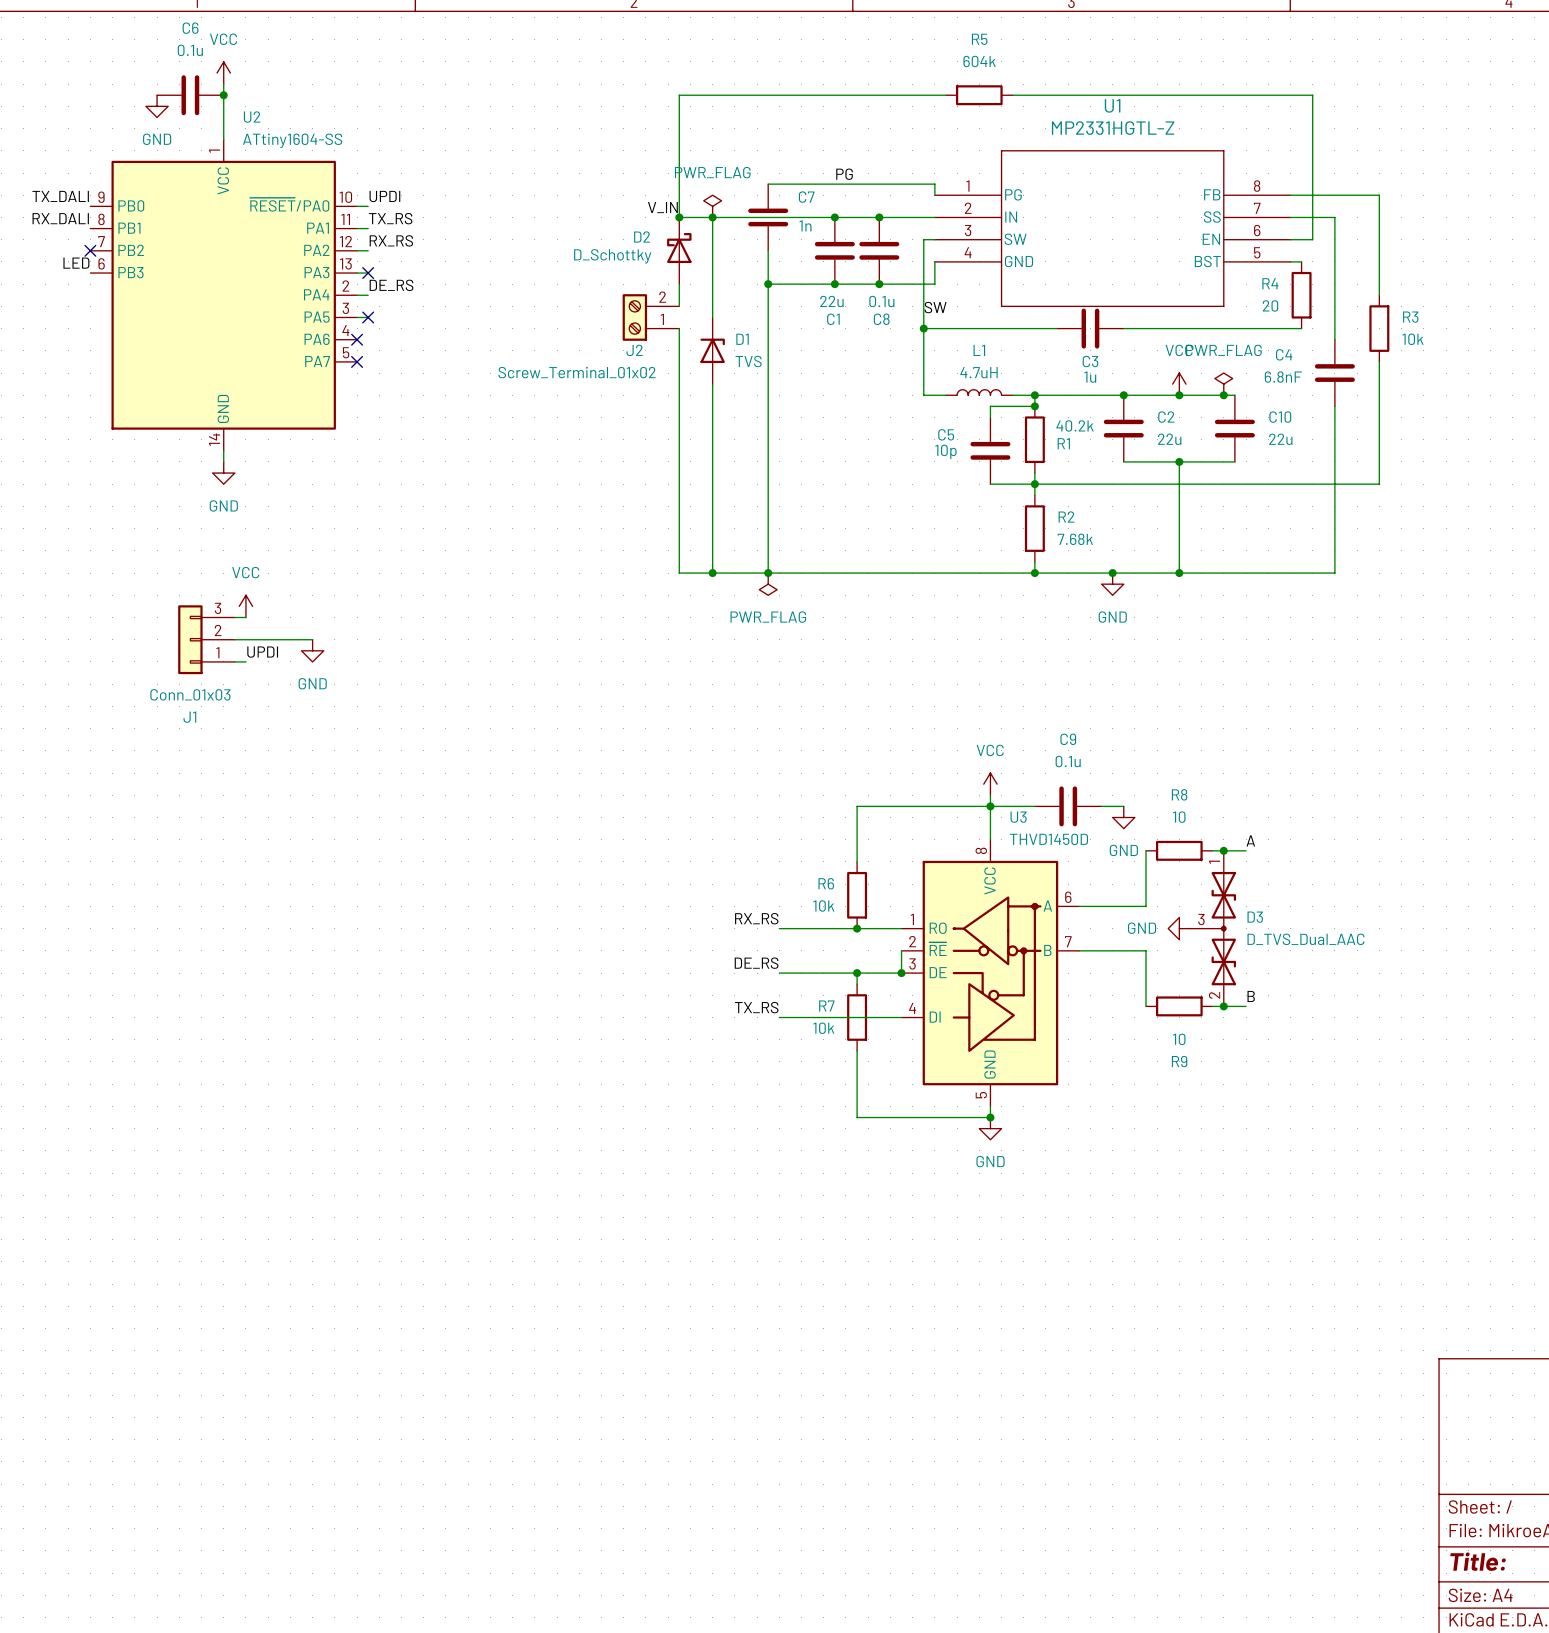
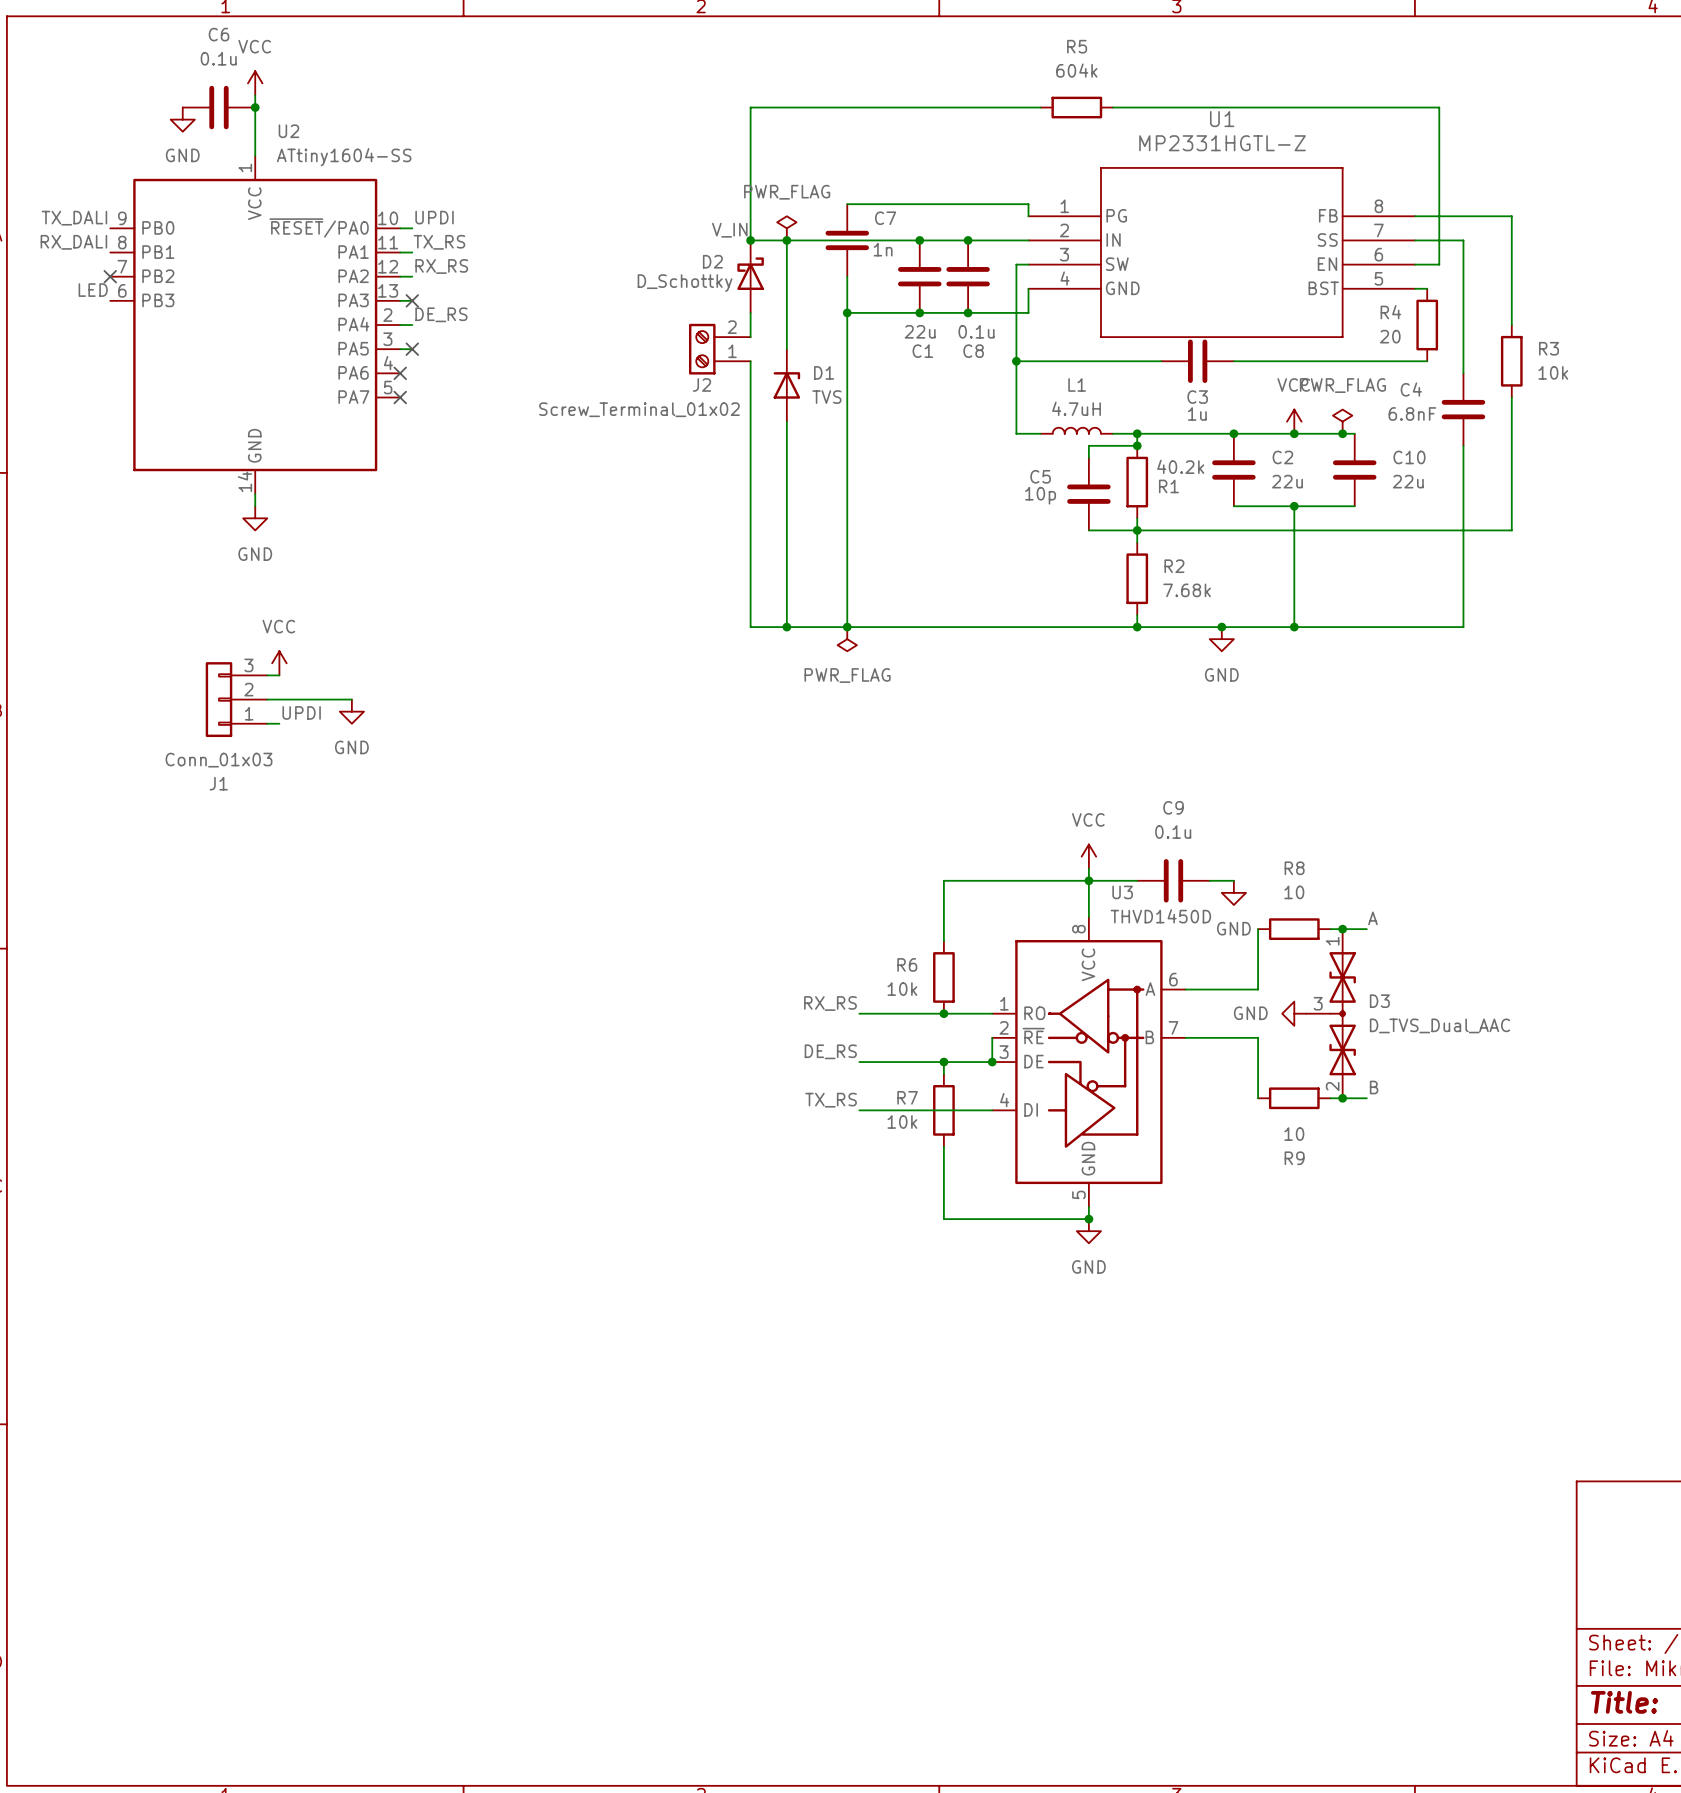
label: PG (844, 174) -> none
label: SW (935, 307) -> none

